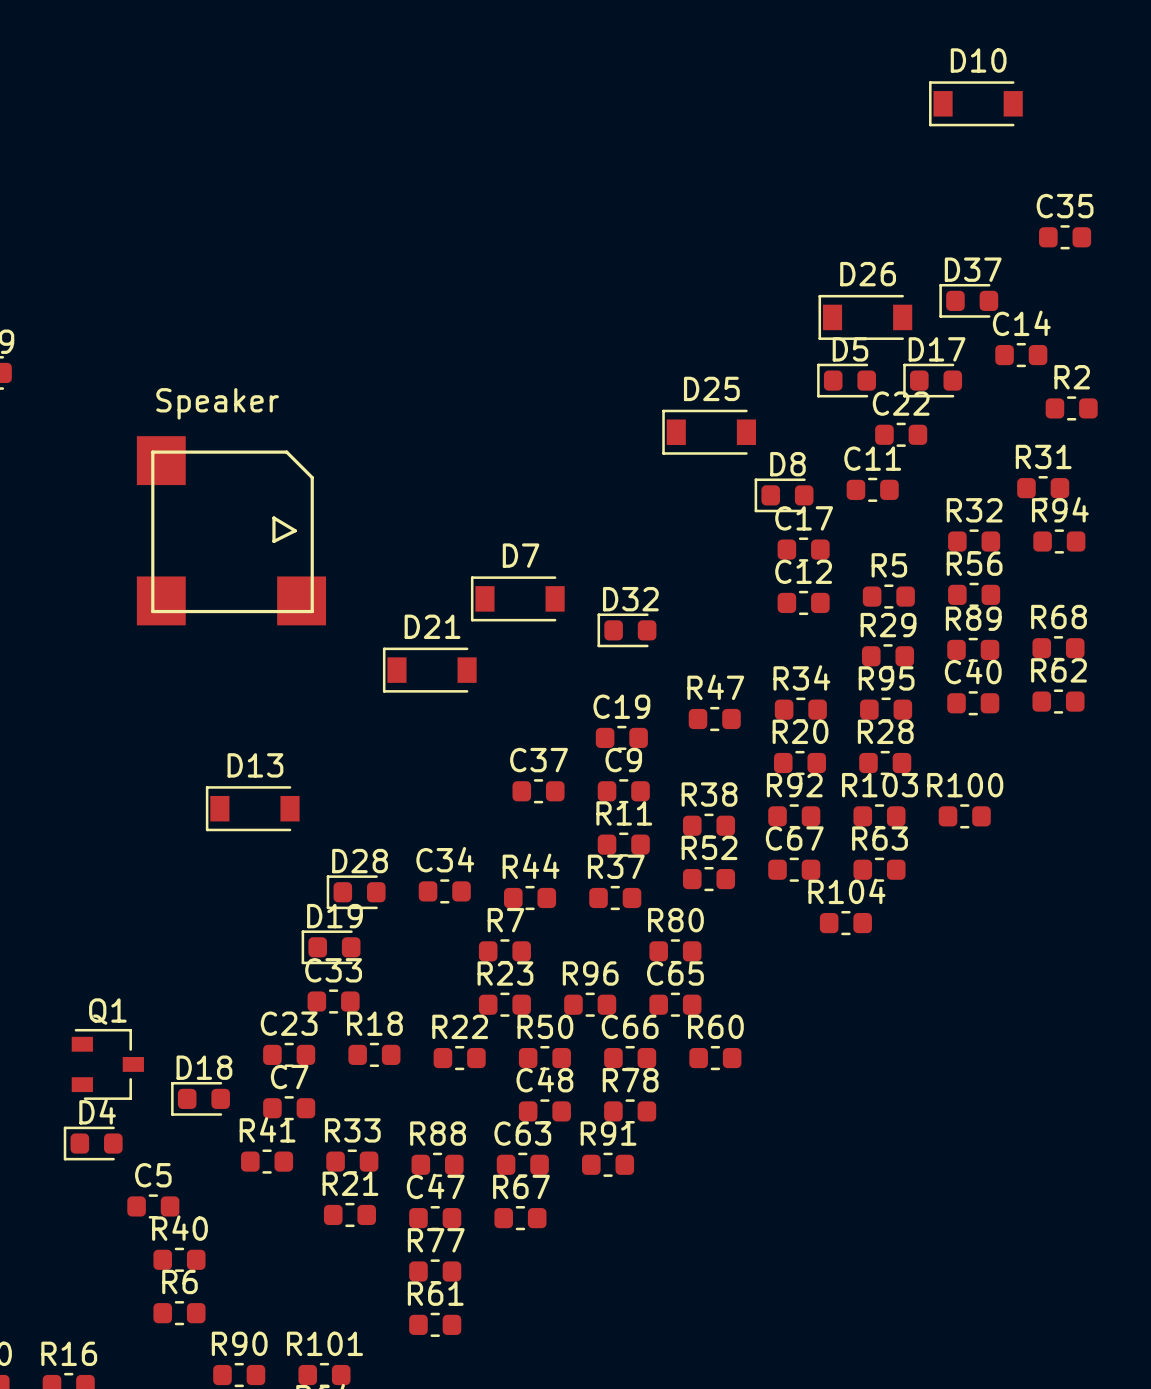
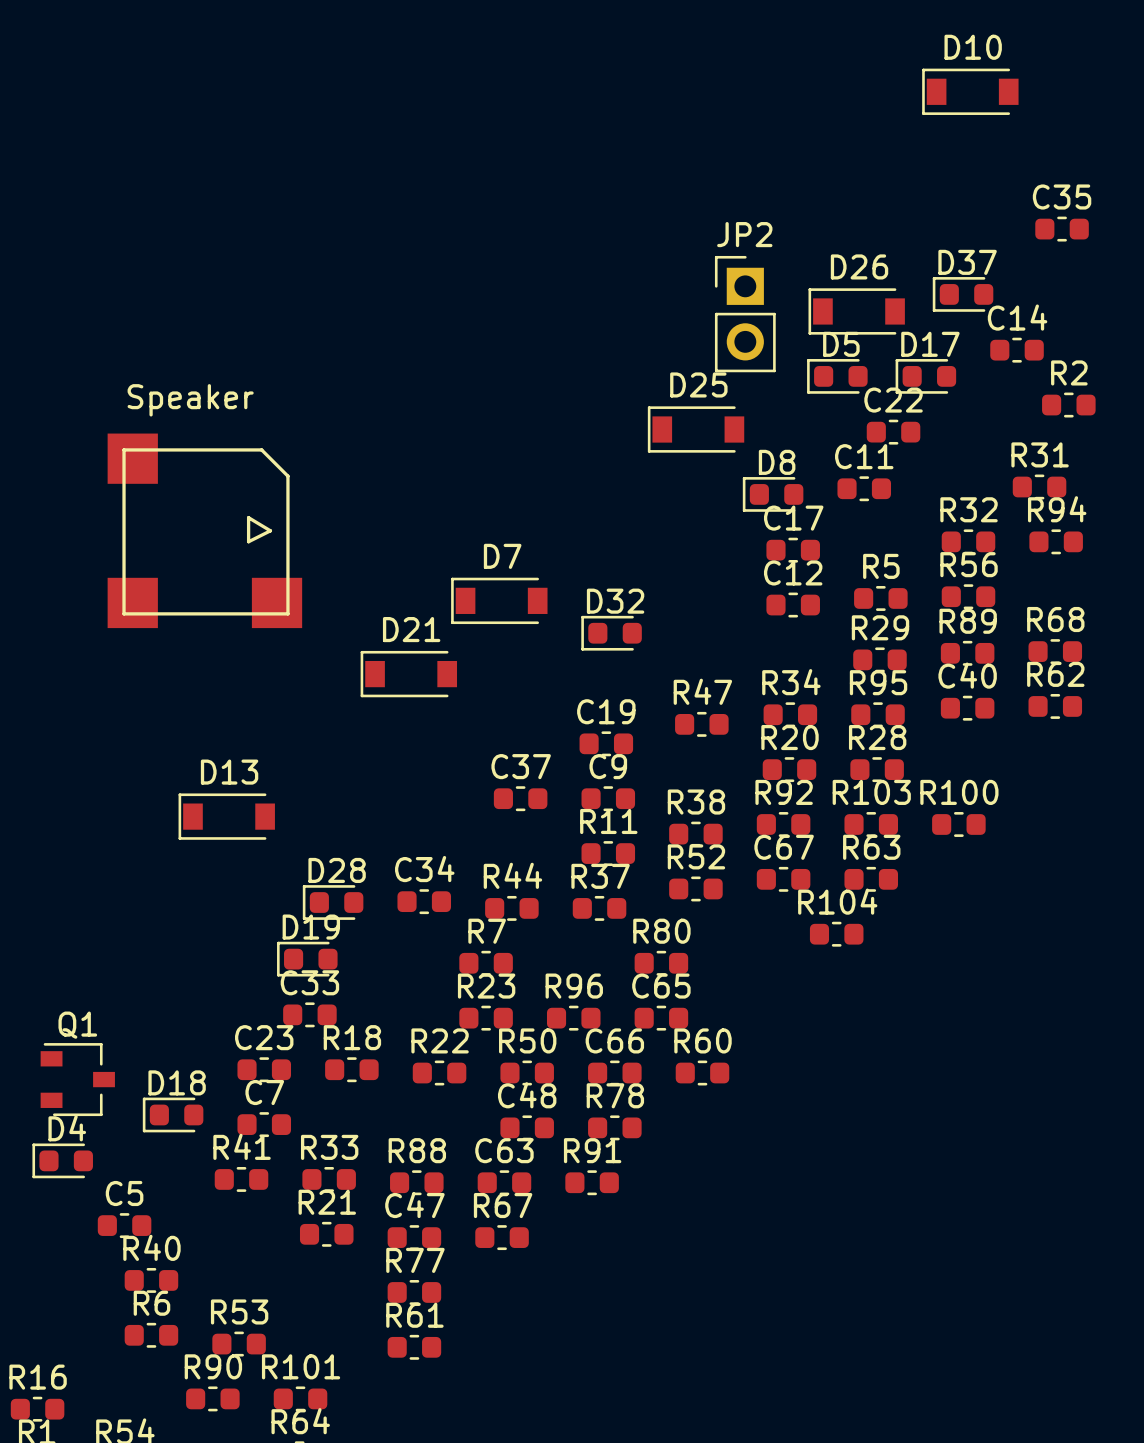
JP2: none -> (745, 314)
R53: none -> (239, 1344)

